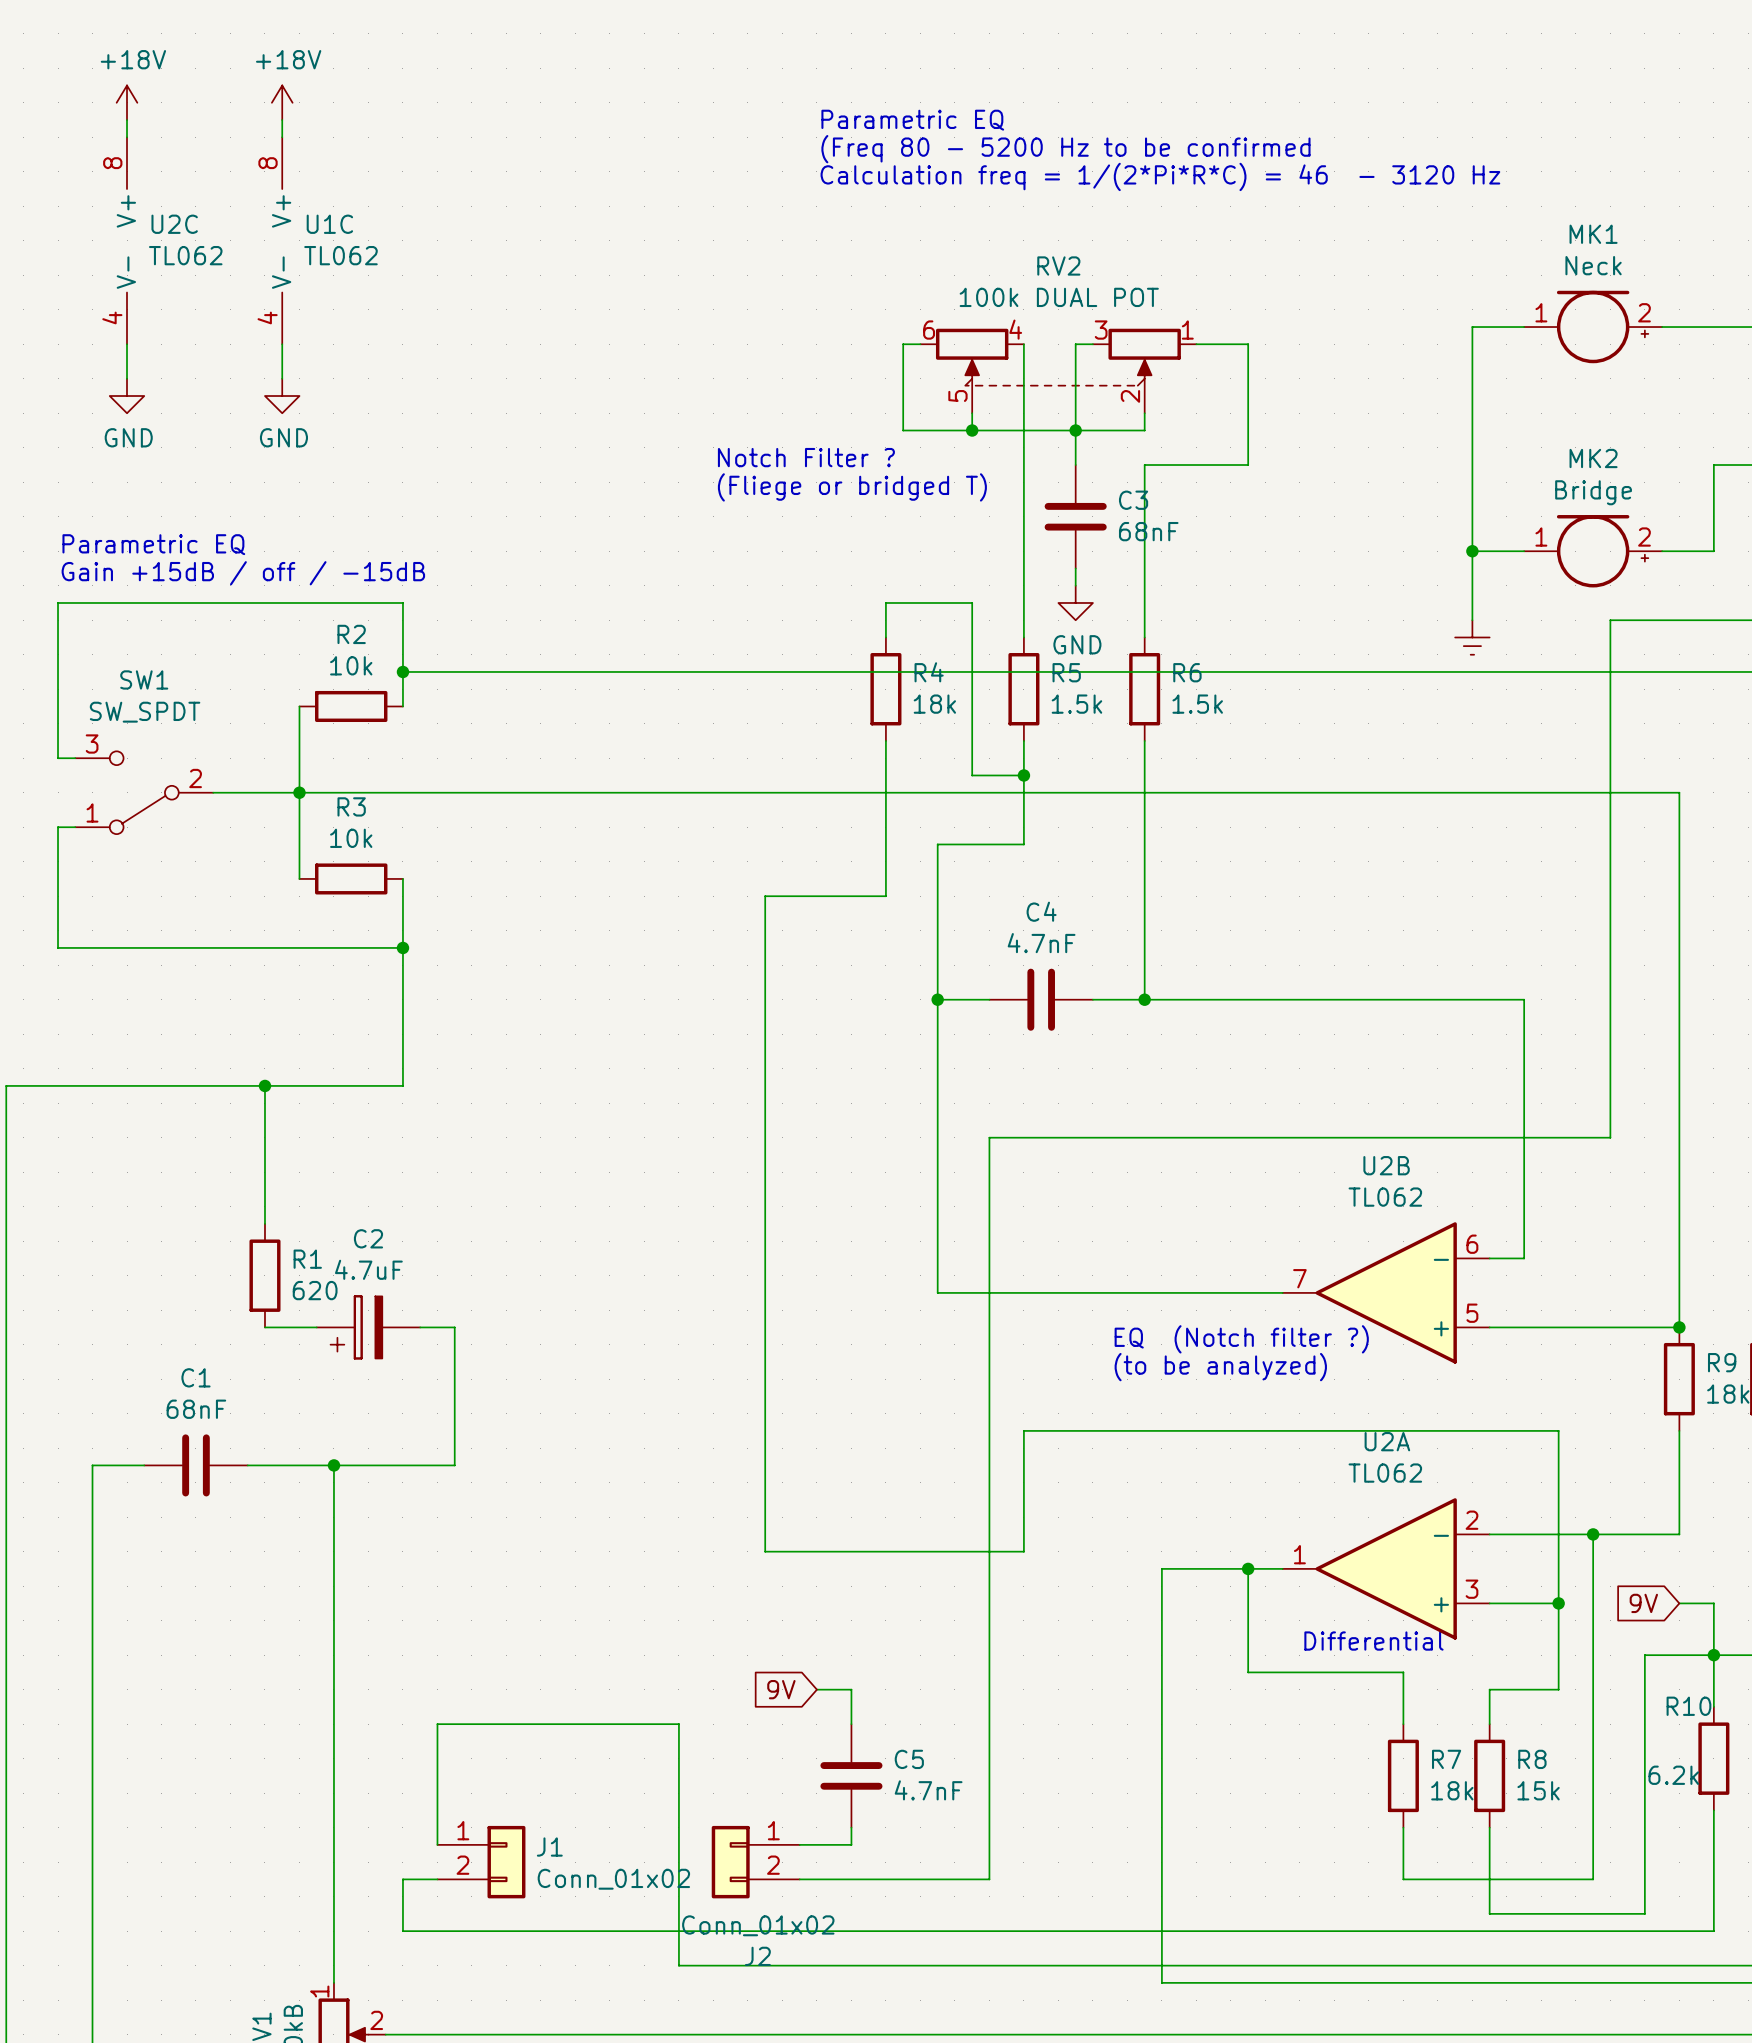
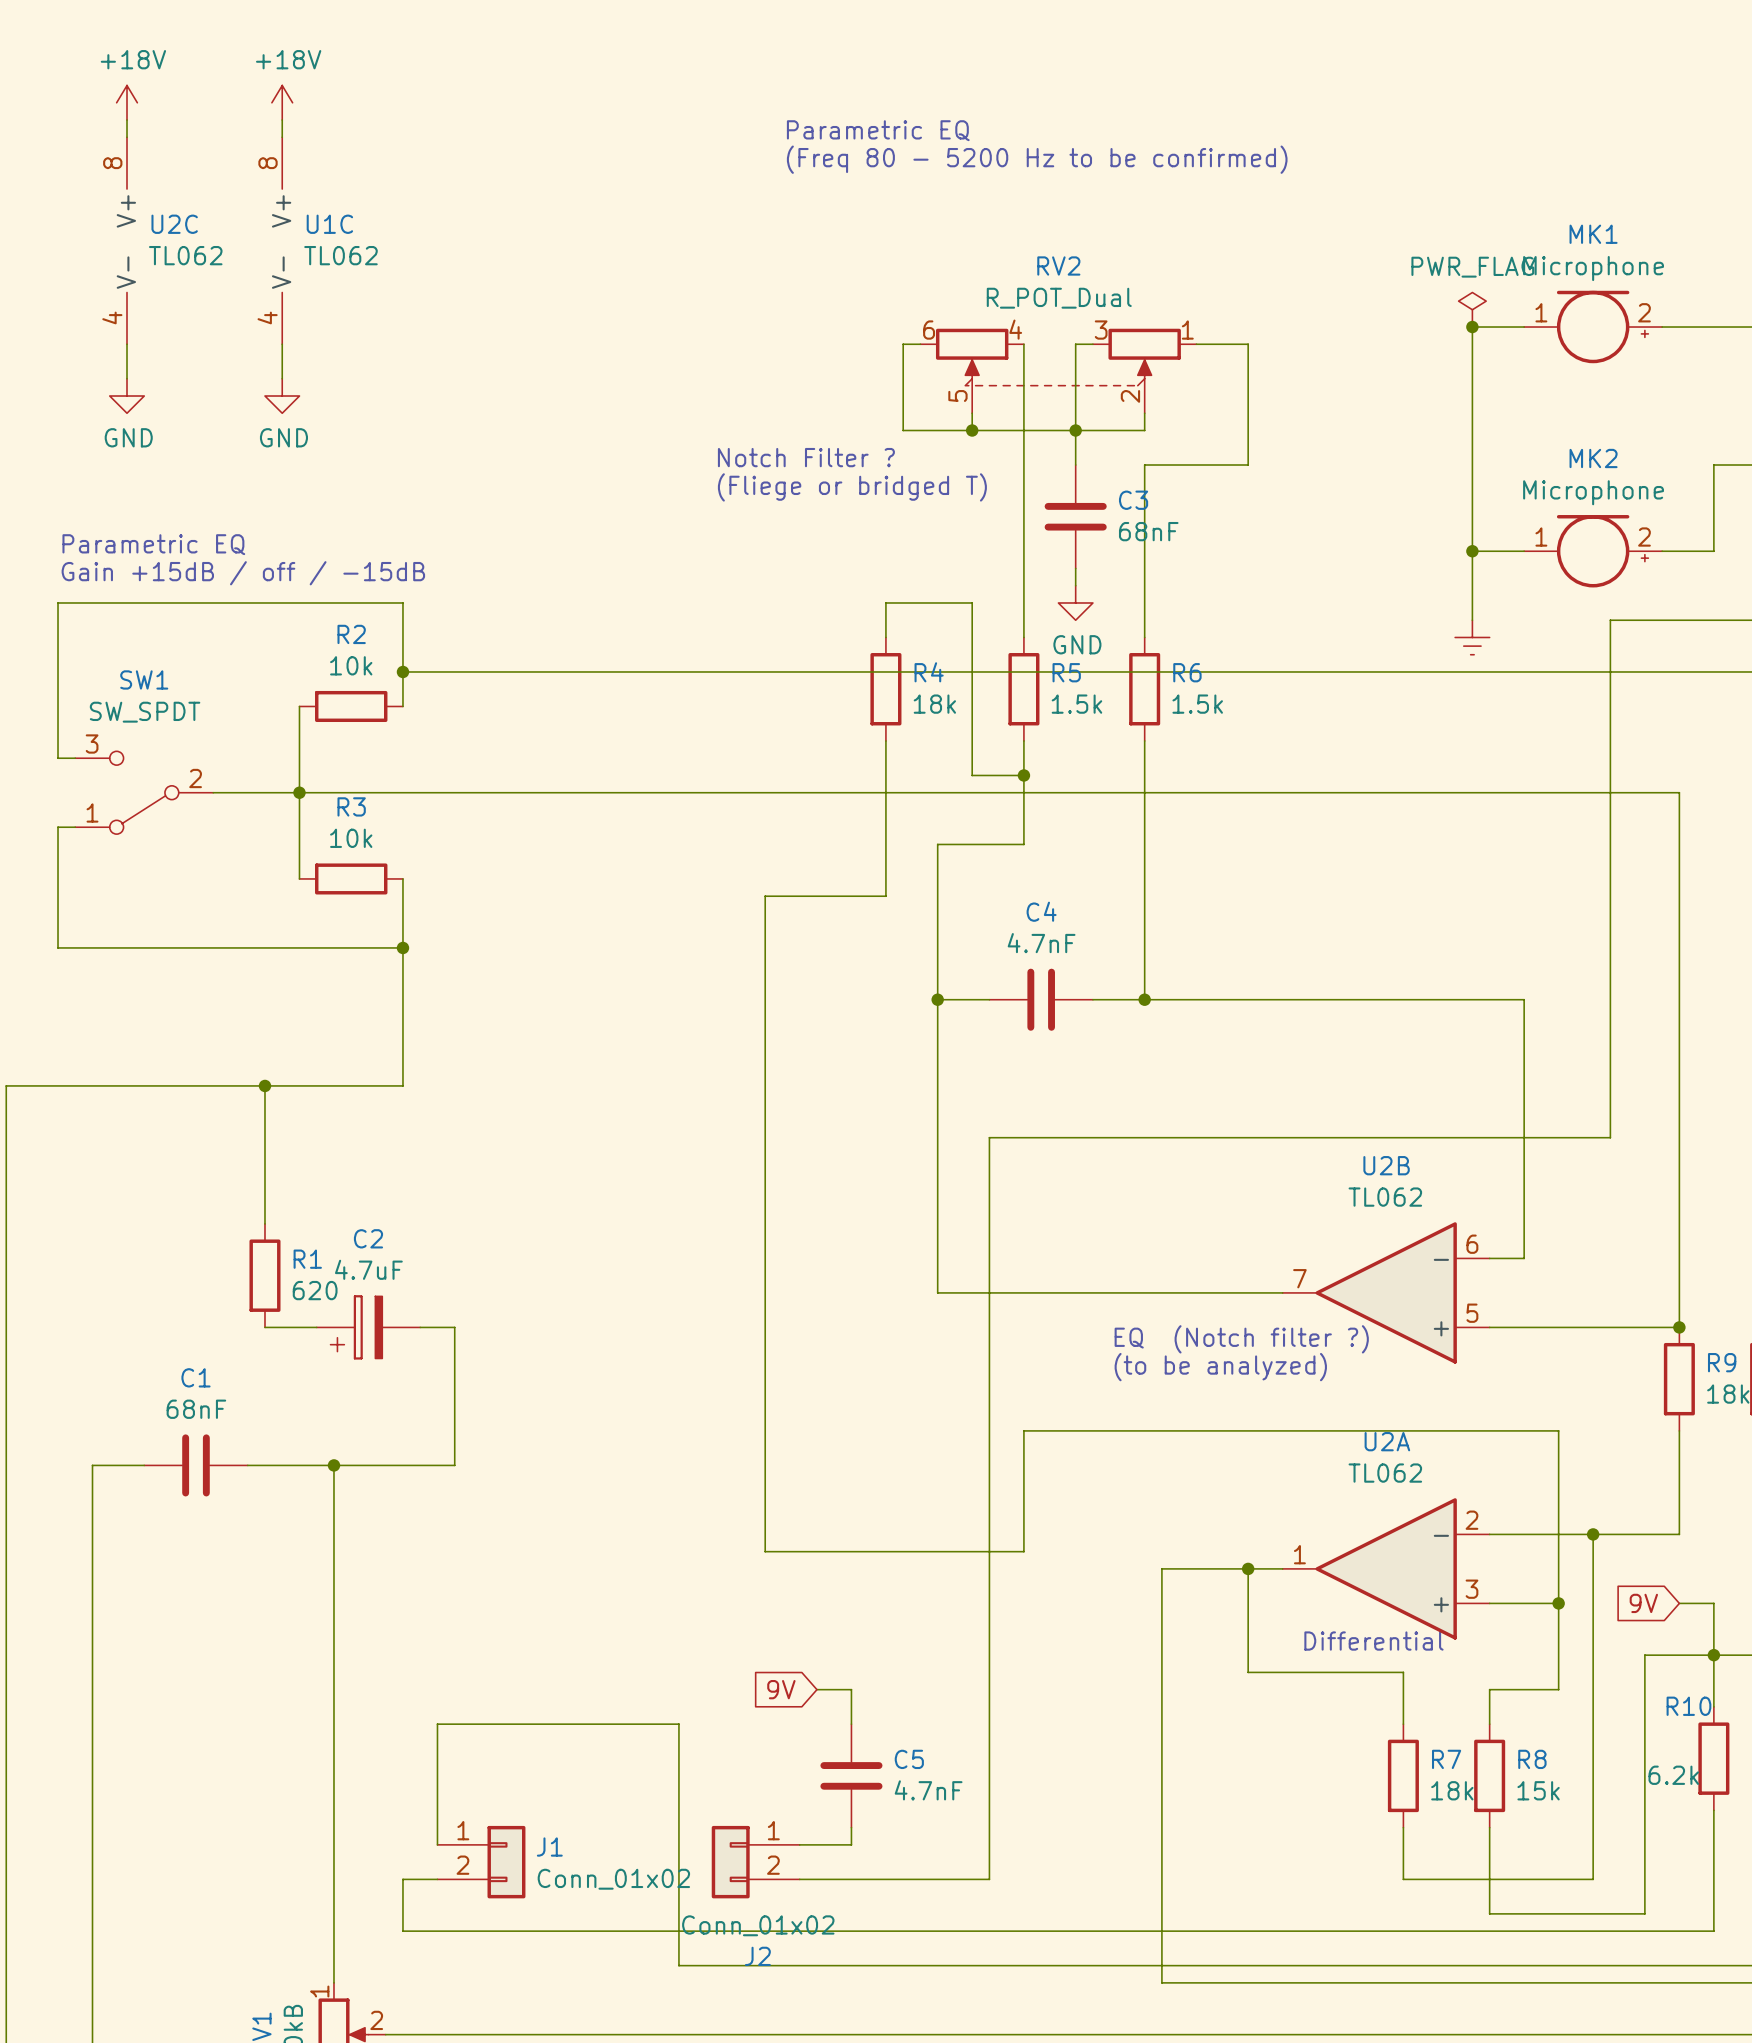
text position: Parametric EQ (912, 120) -> Parametric EQ (878, 130)
text: (Freq 80 - 5200 Hz to be confirmed (1065, 149) -> (Freq 80 - 5200 Hz to be confirmed) (1037, 159)
text: Calculation freq = 1/(2*Pi*R*C) = 46 - 3120 Hz (1160, 176) -> none
MK1 value: Neck (1593, 265) -> Microphone (1593, 268)
RV2 value: 100k DUAL POT (1059, 297) -> R_POT_Dual (1059, 298)
power symbol: none -> PWR_FLAG (1472, 309)
junction: none -> (1472, 327)
MK2 value: Bridge (1593, 492) -> Microphone (1593, 492)

